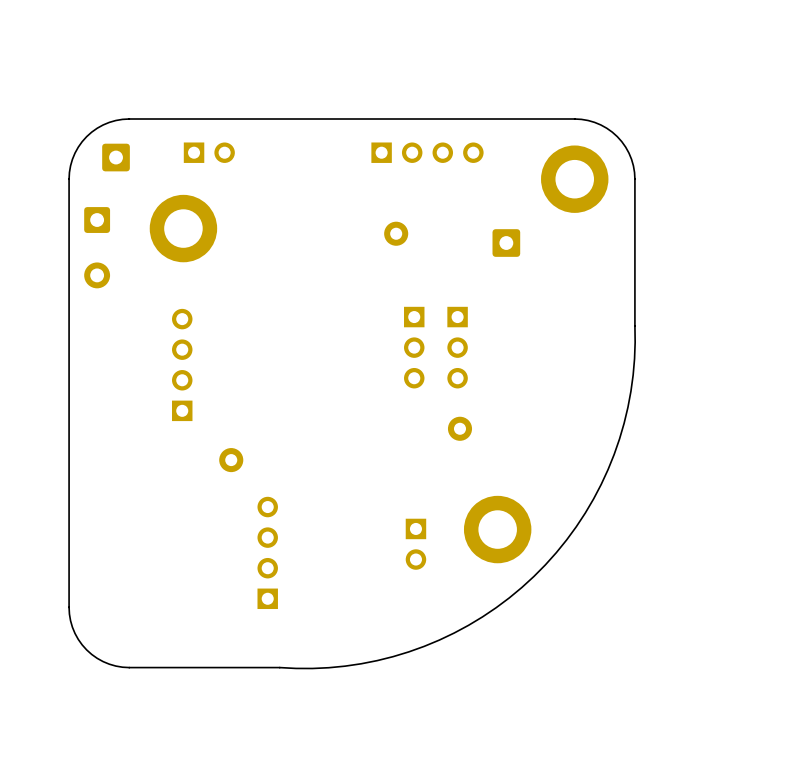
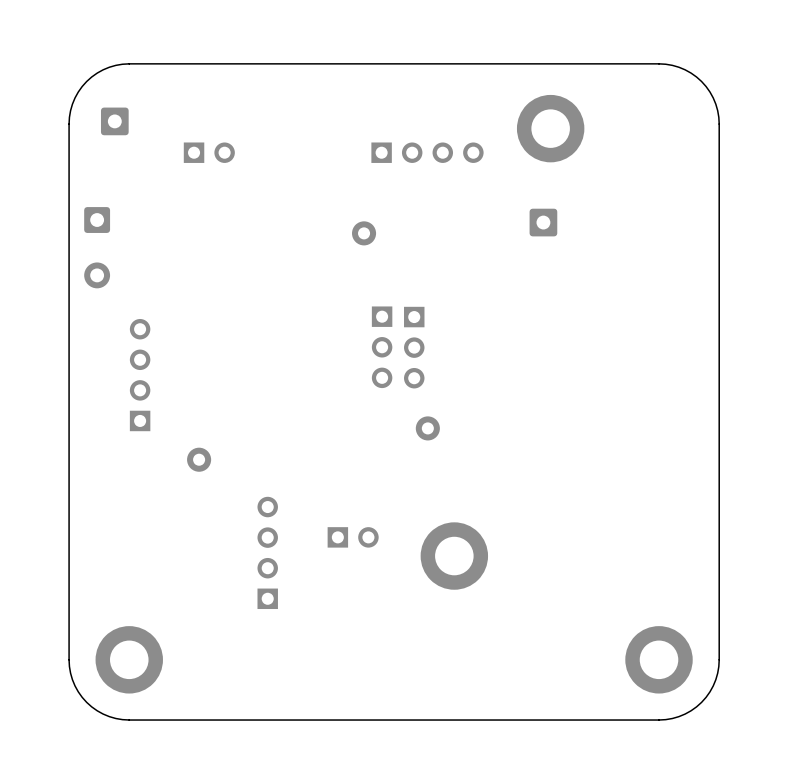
part position: (116, 157) -> (114, 121)
board edge: (69, 179) (72, 159) (82, 141) (97, 128) (109, 122) (122, 119) (574, 119) (594, 122) (612, 132) (621, 141) (628, 153) (633, 165) (635, 342) (630, 391) (619, 439) (601, 484) (585, 513) (556, 552) (521, 587) (482, 616) (439, 640) (408, 651) (377, 660) (328, 667) (122, 667) (103, 661) (86, 649) (78, 639) (72, 627) (69, 607) -> (69, 179) (69, 117) (75, 97) (82, 86) (97, 73) (109, 67) (122, 64) (665, 64) (685, 69) (701, 81) (713, 97) (718, 117) (719, 659) (717, 673) (713, 685) (706, 697) (696, 706) (678, 716) (659, 720) (122, 719) (103, 714) (91, 706) (82, 697) (75, 685) (69, 666) (69, 607)
part position: (574, 179) -> (550, 128)
part: (183, 228) -> none
part position: (396, 233) -> (364, 233)
part position: (506, 243) -> (543, 222)
part position: (457, 347) -> (382, 347)
part position: (182, 364) -> (140, 375)
part position: (459, 428) -> (427, 428)
part position: (231, 460) -> (199, 459)
part position: (497, 529) -> (454, 556)
part rotation: 0° (415, 544) -> 90° counterclockwise (353, 537)
part position: (415, 544) -> (353, 537)
part: none -> (129, 659)
part: none -> (659, 659)

